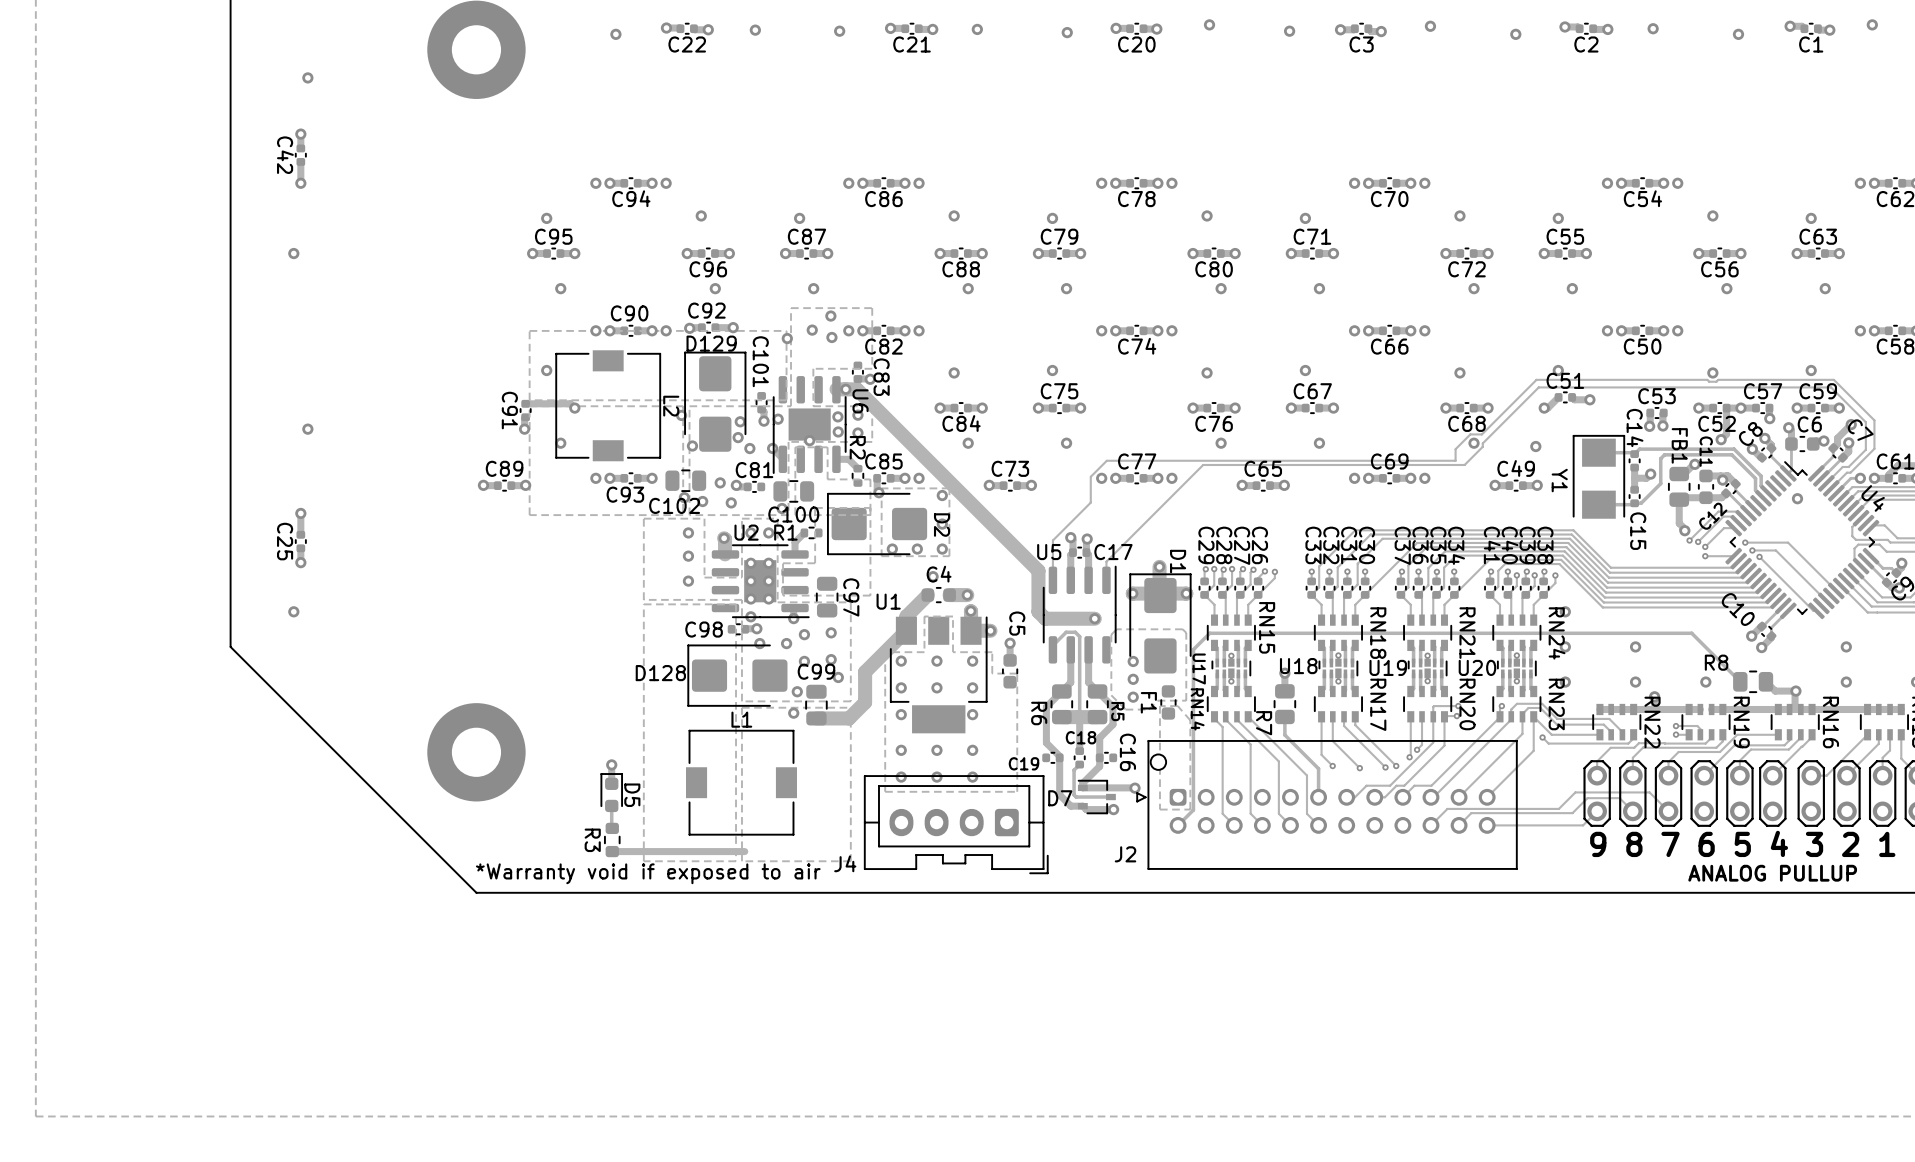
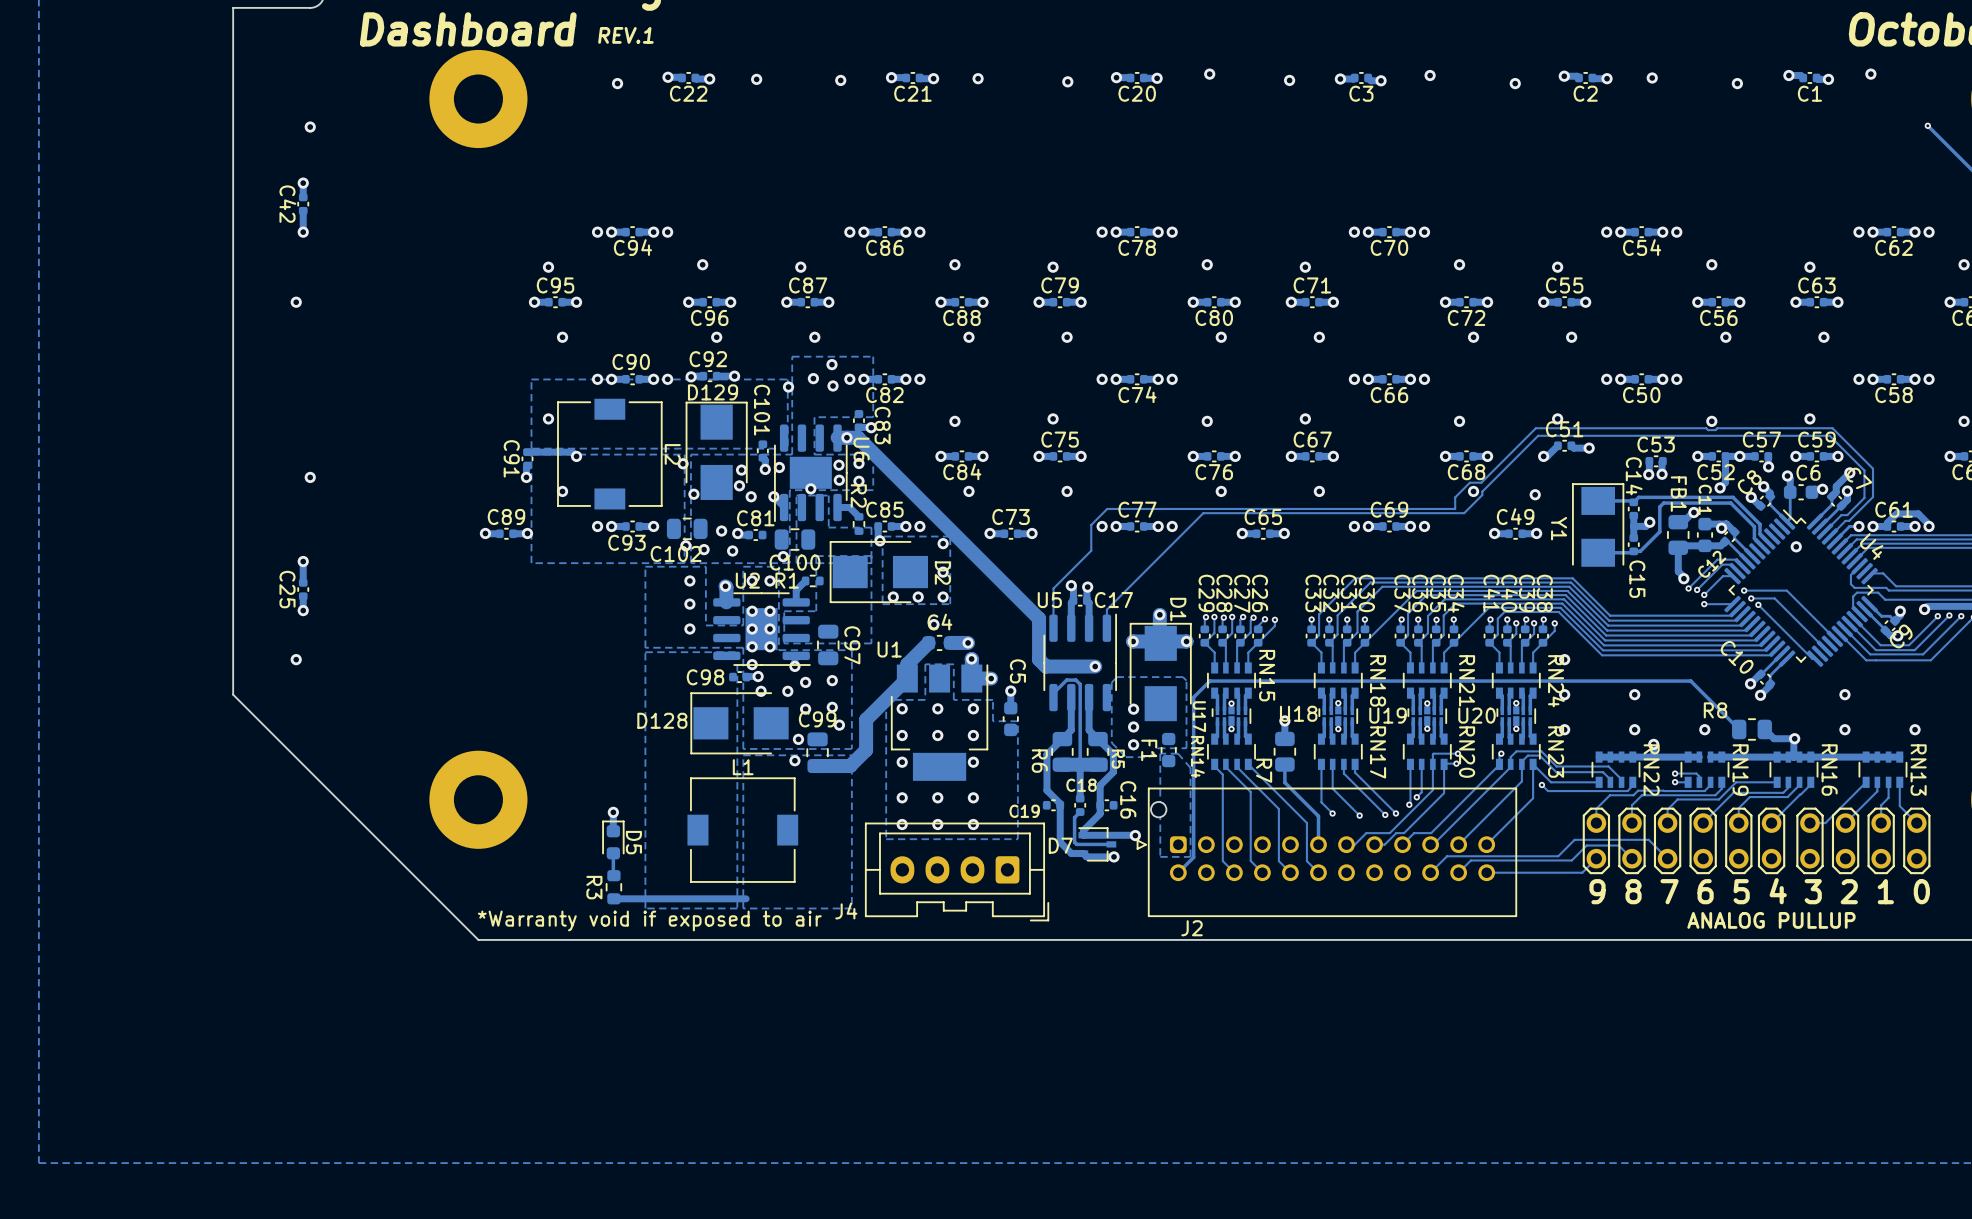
D129 footprint: [684, 351, 747, 452] -> [685, 401, 748, 500]
D2 footprint: [827, 492, 928, 556] -> [829, 541, 929, 604]
D1 footprint: [1129, 573, 1192, 674] -> [1129, 622, 1192, 722]
D128 footprint: [687, 644, 788, 707] -> [690, 692, 789, 755]
J2 name position: J2 (1125, 854) -> J2 (1192, 928)

